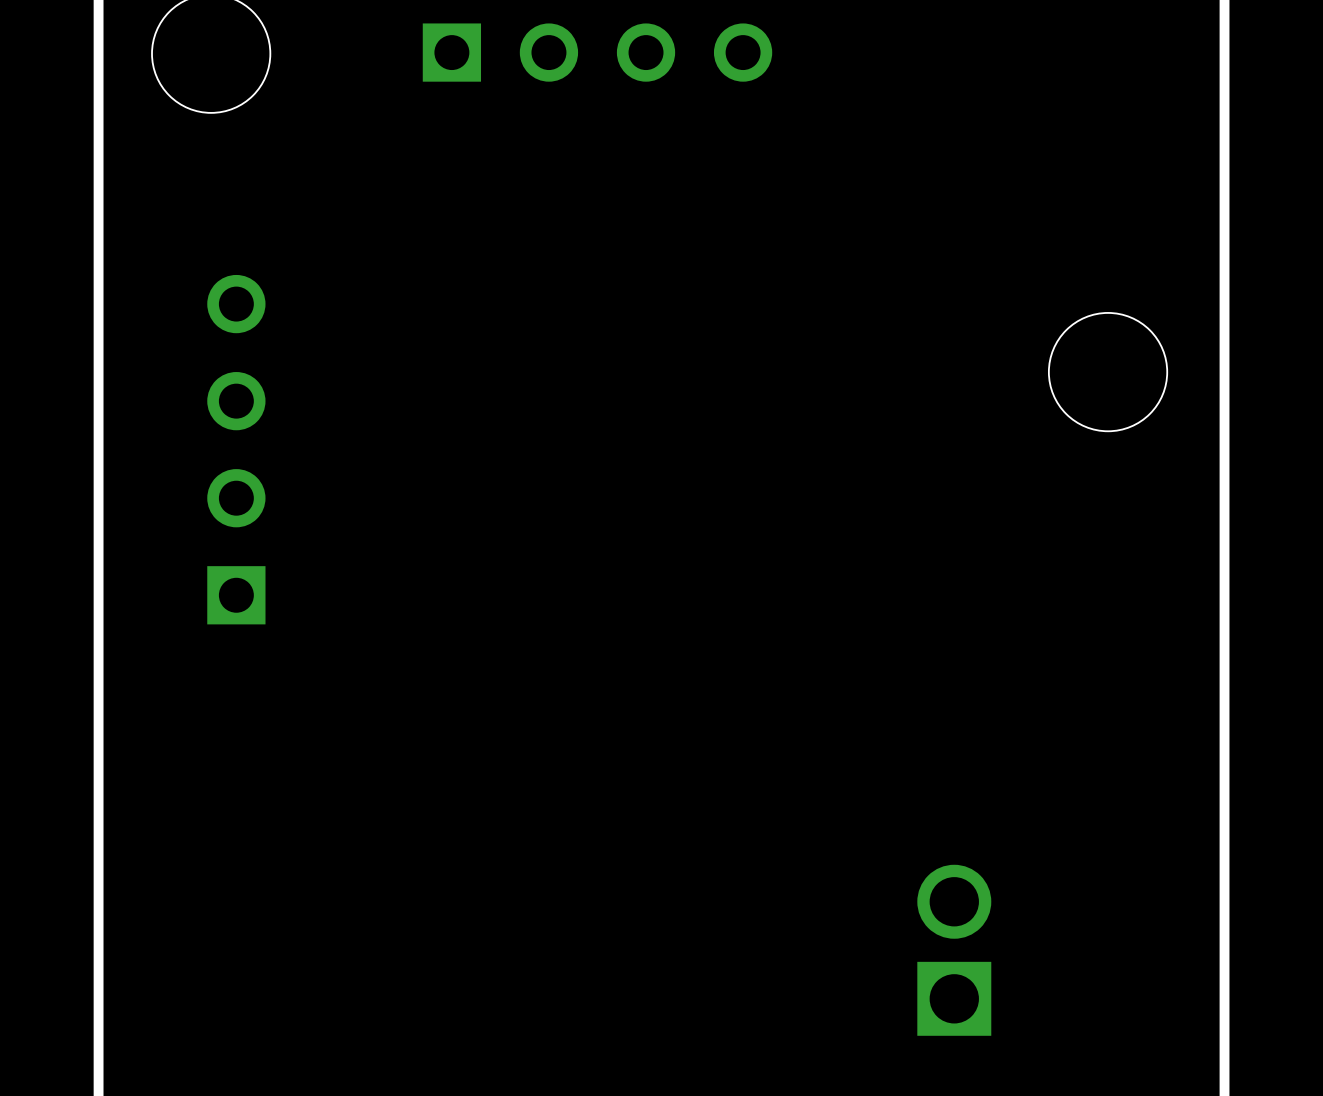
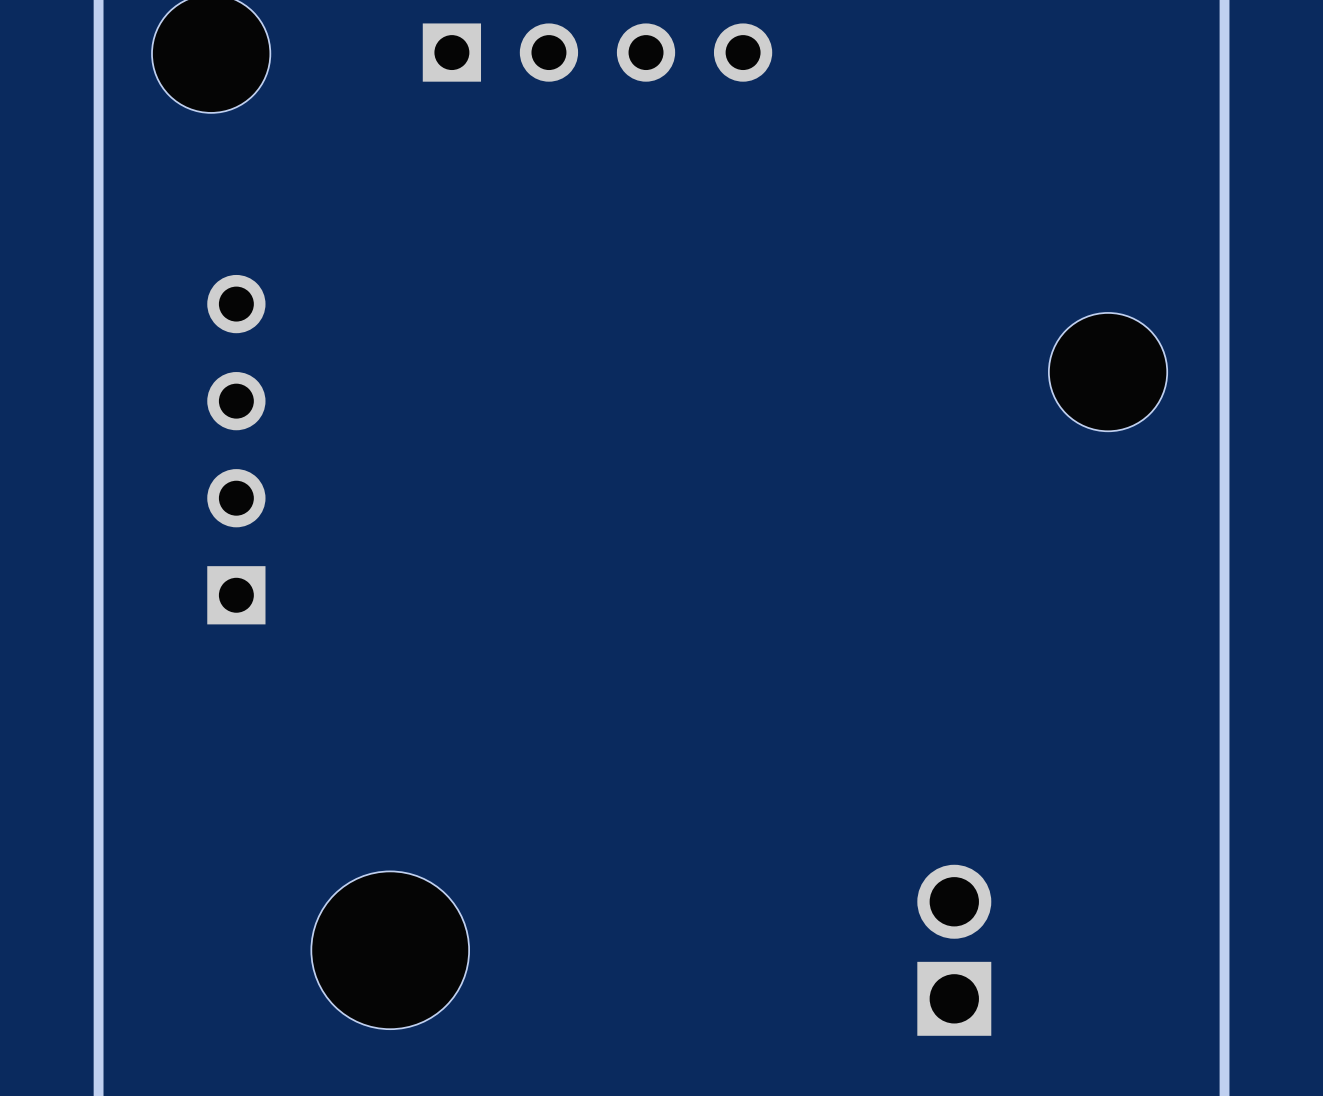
hole: none -> (390, 950)

